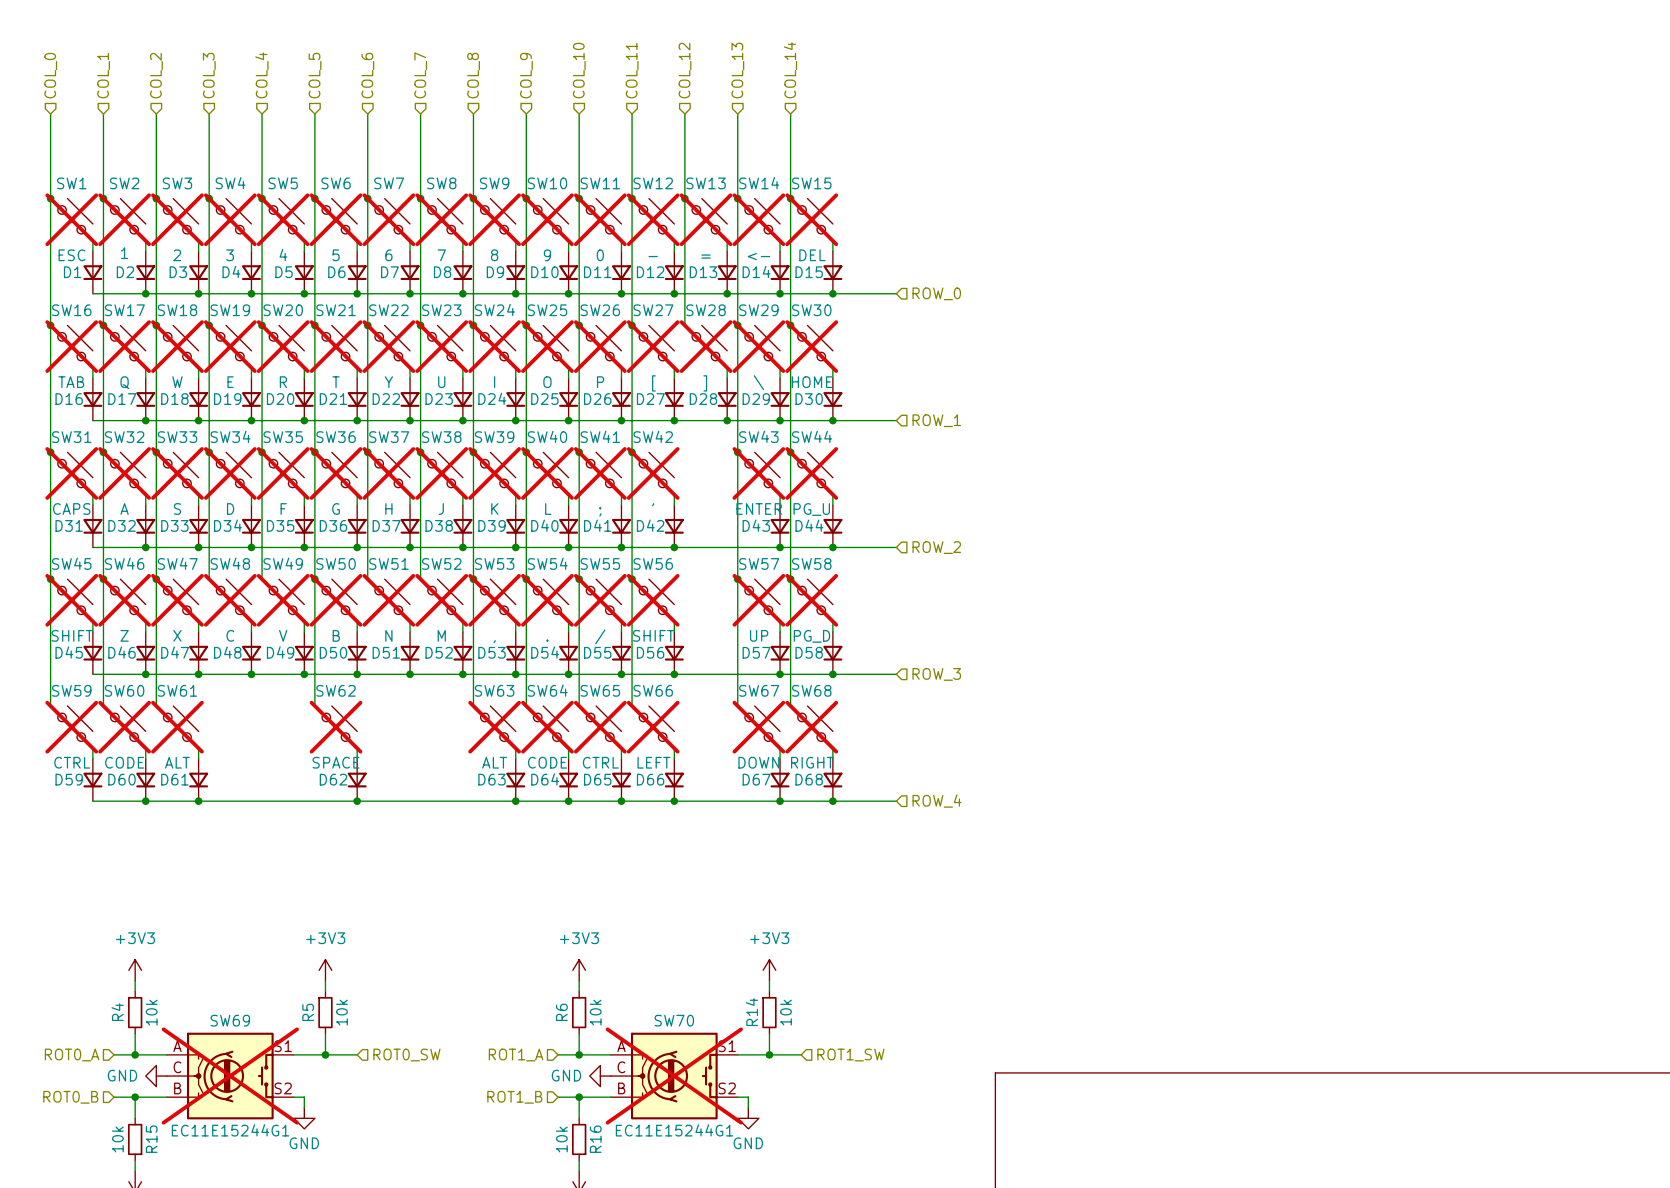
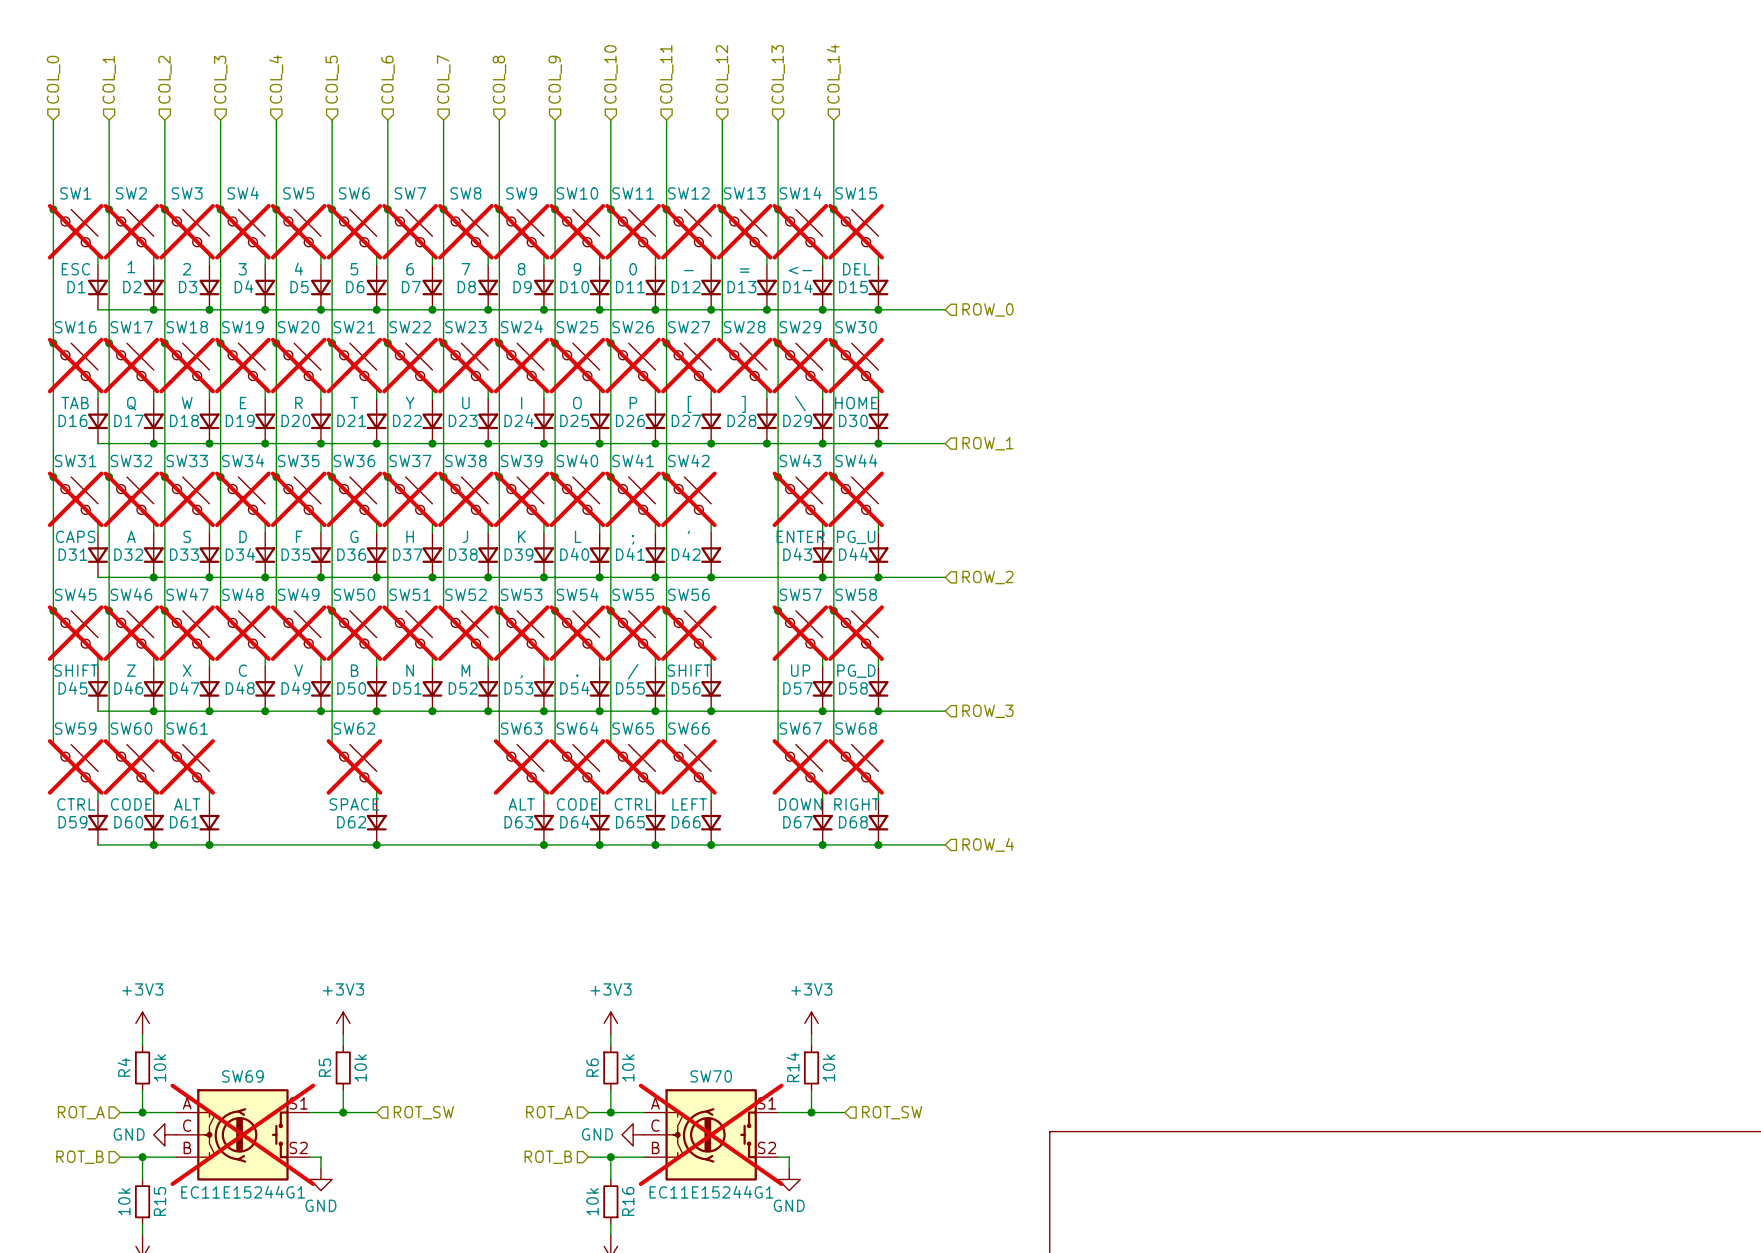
hierarchical label: ROT0_A (72, 1055) -> ROT_A (81, 1112)
hierarchical label: ROT0_SW (406, 1055) -> ROT_SW (423, 1112)
hierarchical label: ROT1_A (516, 1055) -> ROT_A (549, 1112)
hierarchical label: ROT1_SW (850, 1055) -> ROT_SW (892, 1112)
hierarchical label: ROT0_B (70, 1097) -> ROT_B (80, 1157)
hierarchical label: ROT1_B (514, 1097) -> ROT_B (548, 1157)

